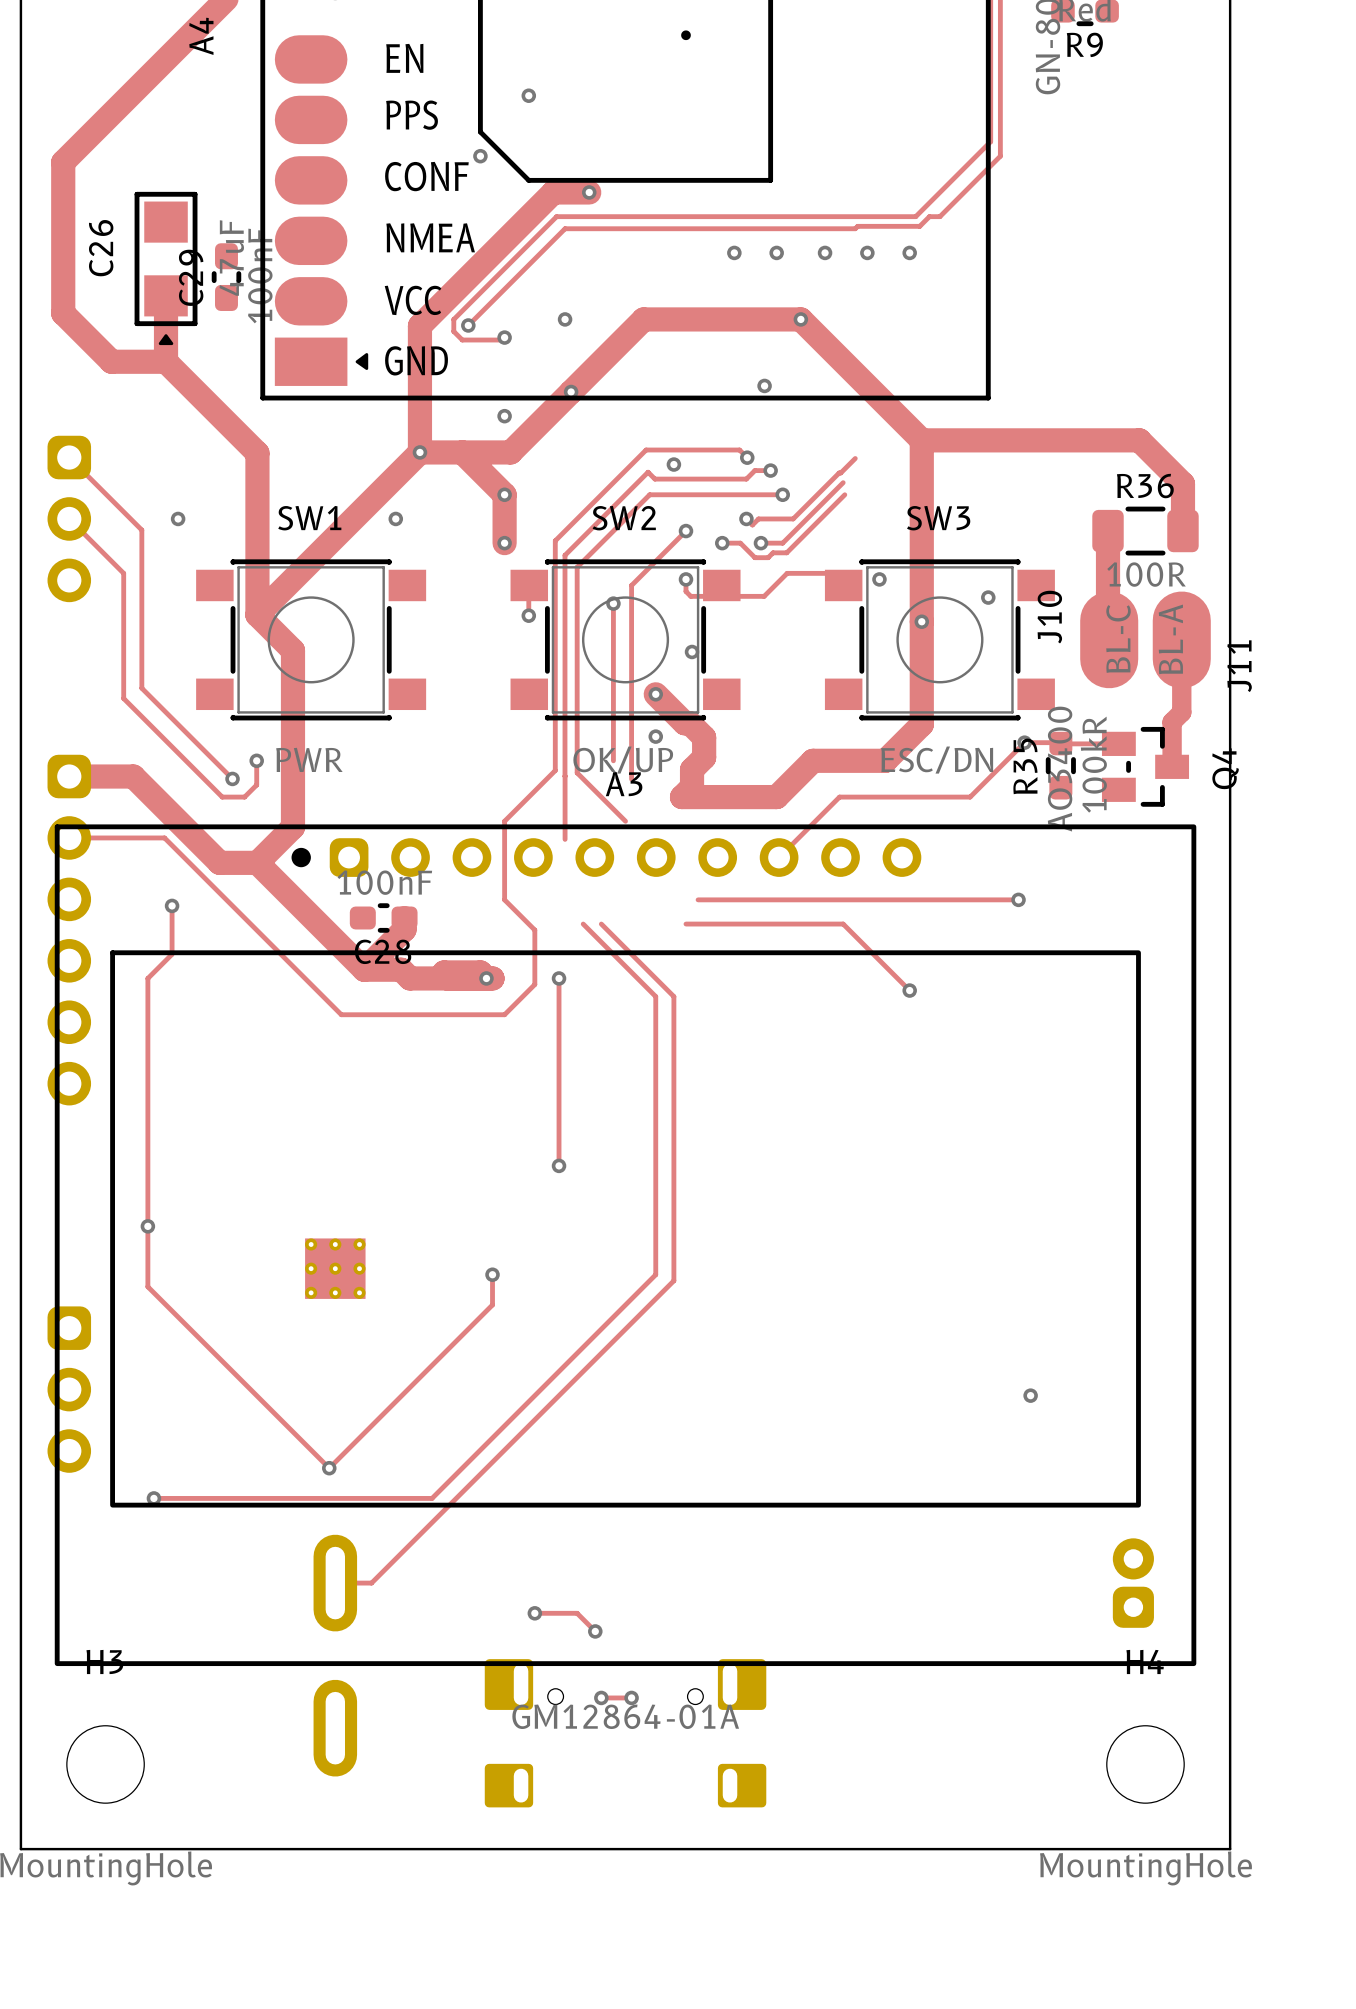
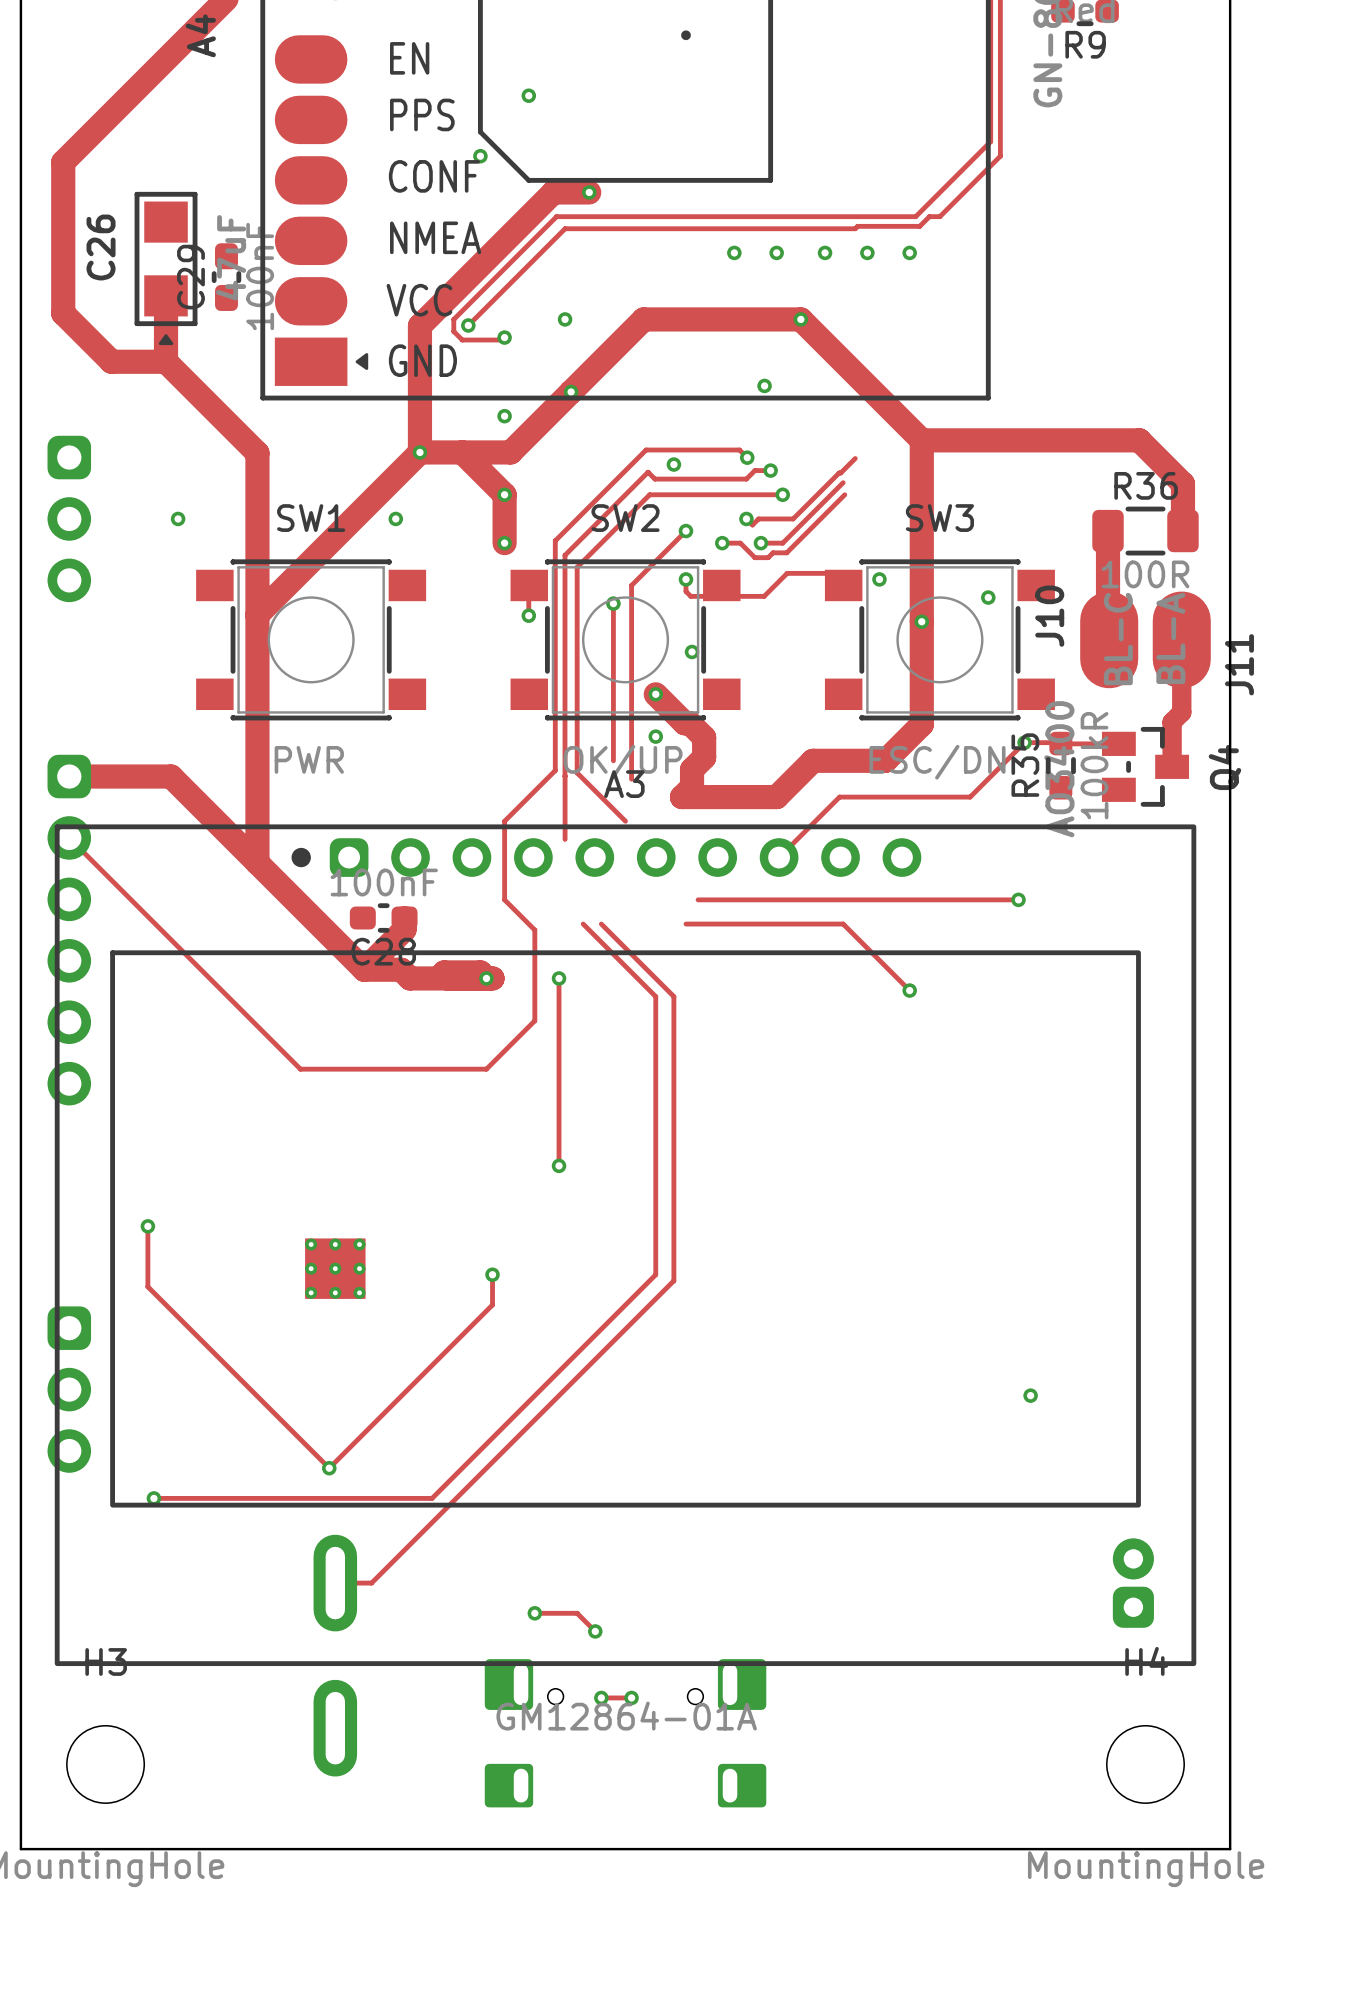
track: (69, 457) (141, 530) (141, 688) (232, 778) -> none
track: (69, 518) (123, 573) (123, 698) (222, 797) (244, 797) (256, 784) (256, 760) -> none
track: (257, 614) (292, 650) (292, 827) (257, 862) (219, 862) (133, 776) -> (257, 614) (257, 862) (171, 776) (133, 776)
via: (256, 760) -> none
via: (232, 778) -> none
track: (69, 837) (164, 837) (341, 1014) (504, 1014) (534, 984) -> (69, 837) (300, 1069) (486, 1069) (534, 1020) (534, 984)
track: (172, 905) (172, 954) (147, 978) (147, 1226) -> none
via: (172, 905) -> none

